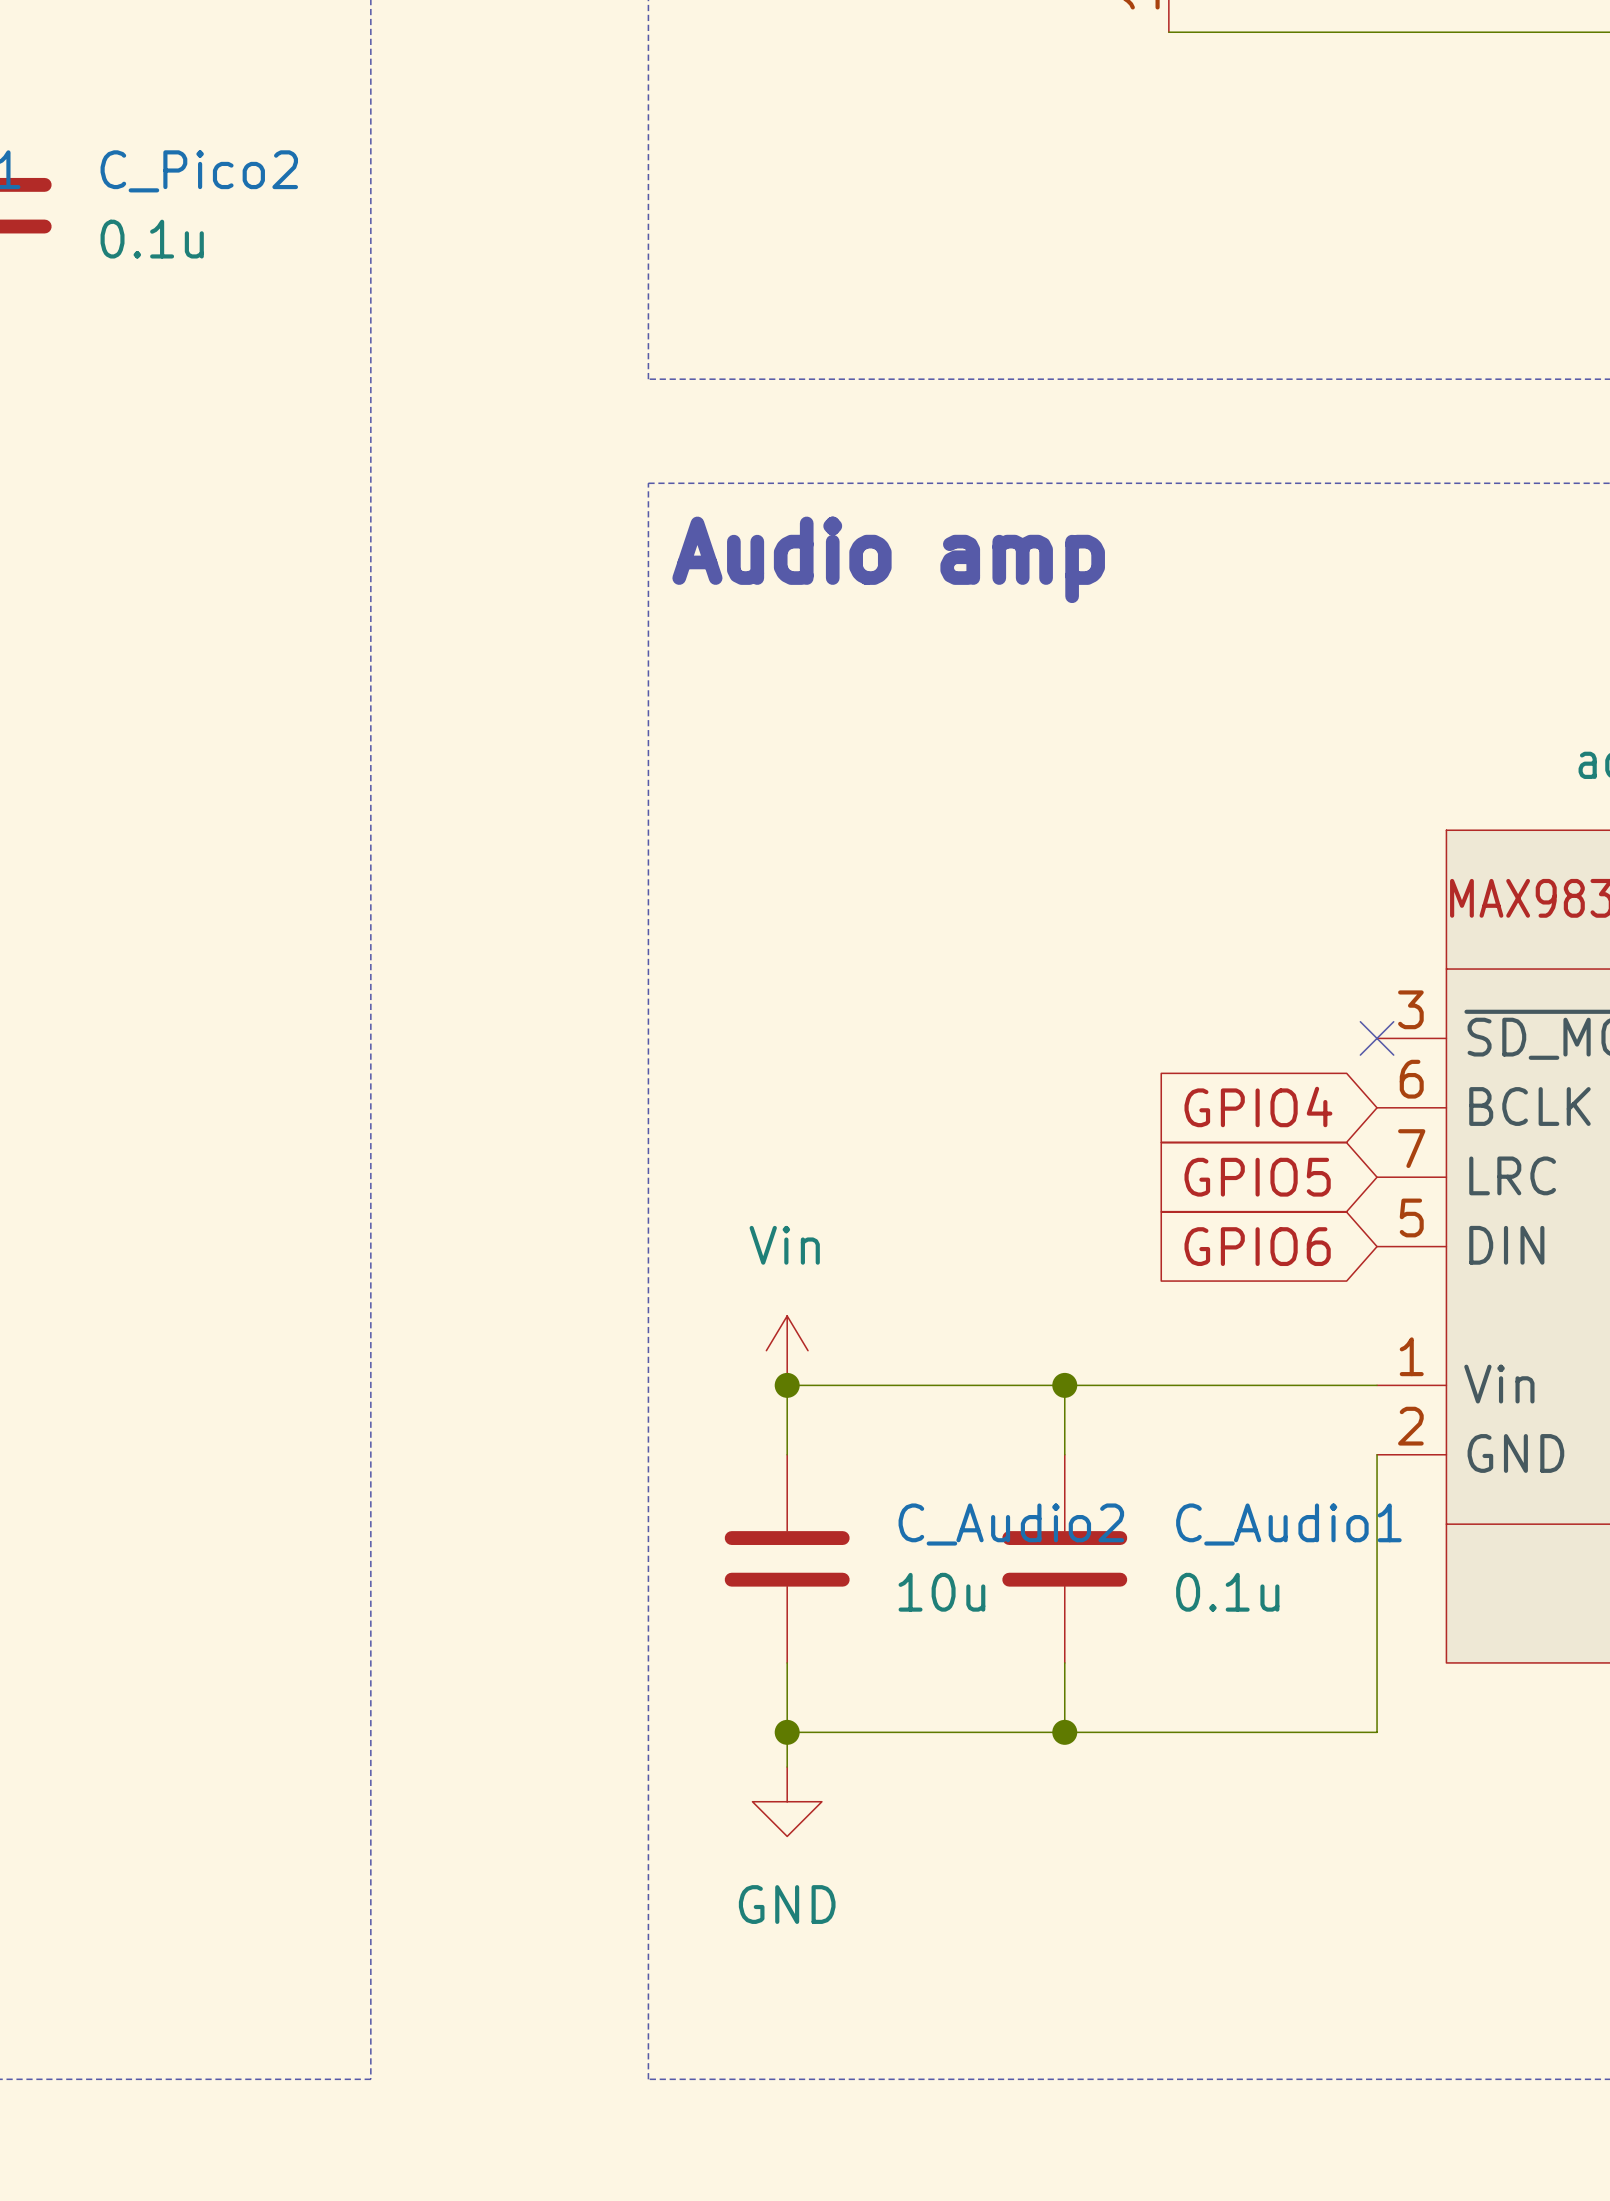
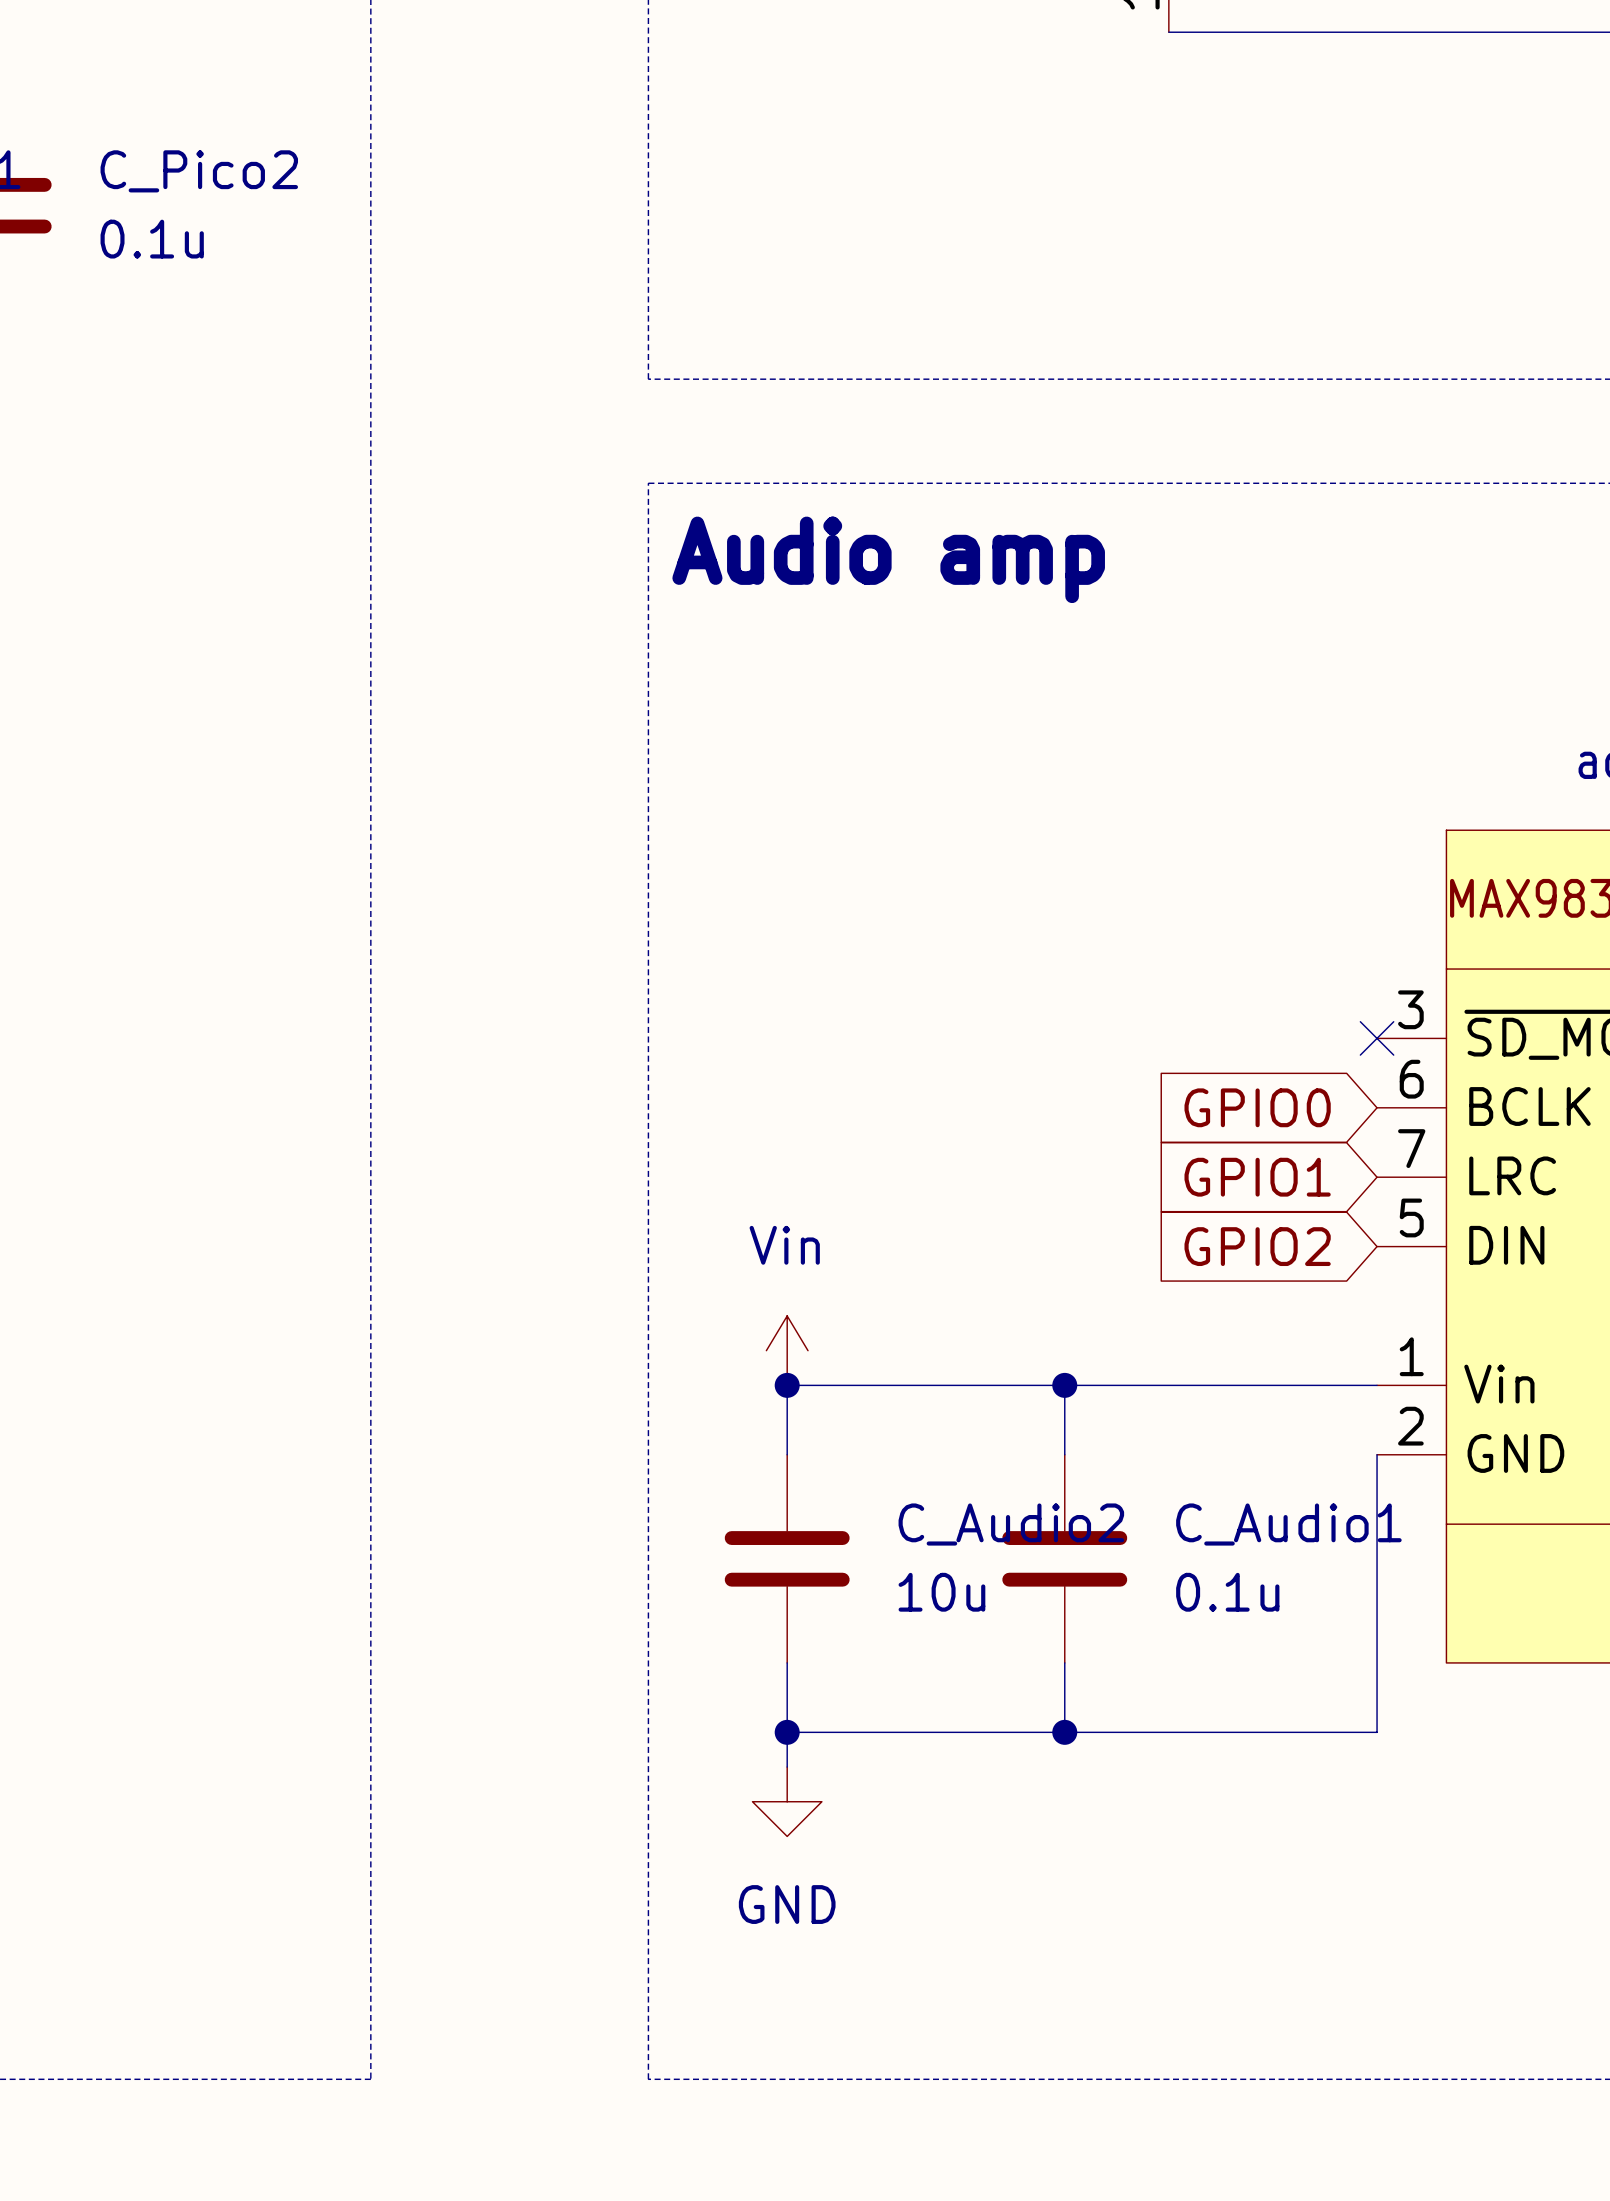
global label: GPIO4 (1258, 1106) -> GPIO0 (1257, 1107)
global label: GPIO5 (1257, 1177) -> GPIO1 (1257, 1177)
global label: GPIO6 (1257, 1246) -> GPIO2 (1257, 1246)

